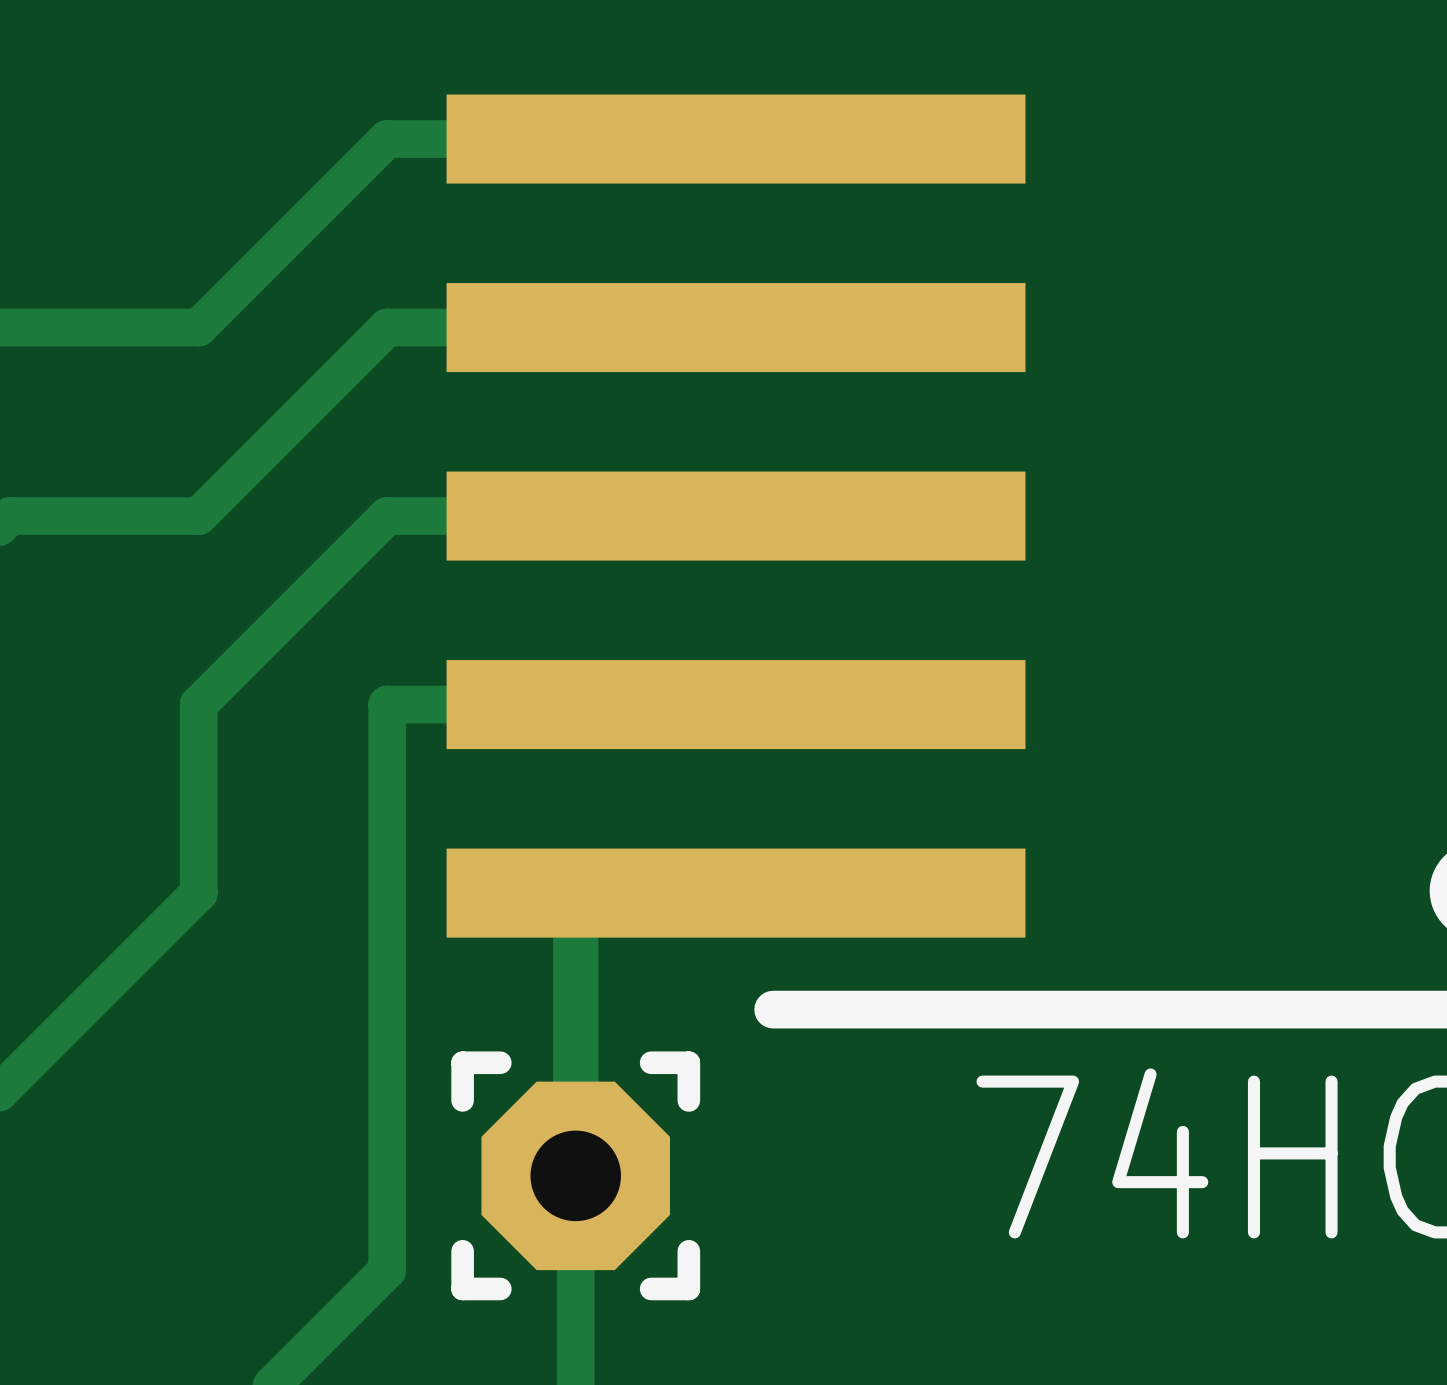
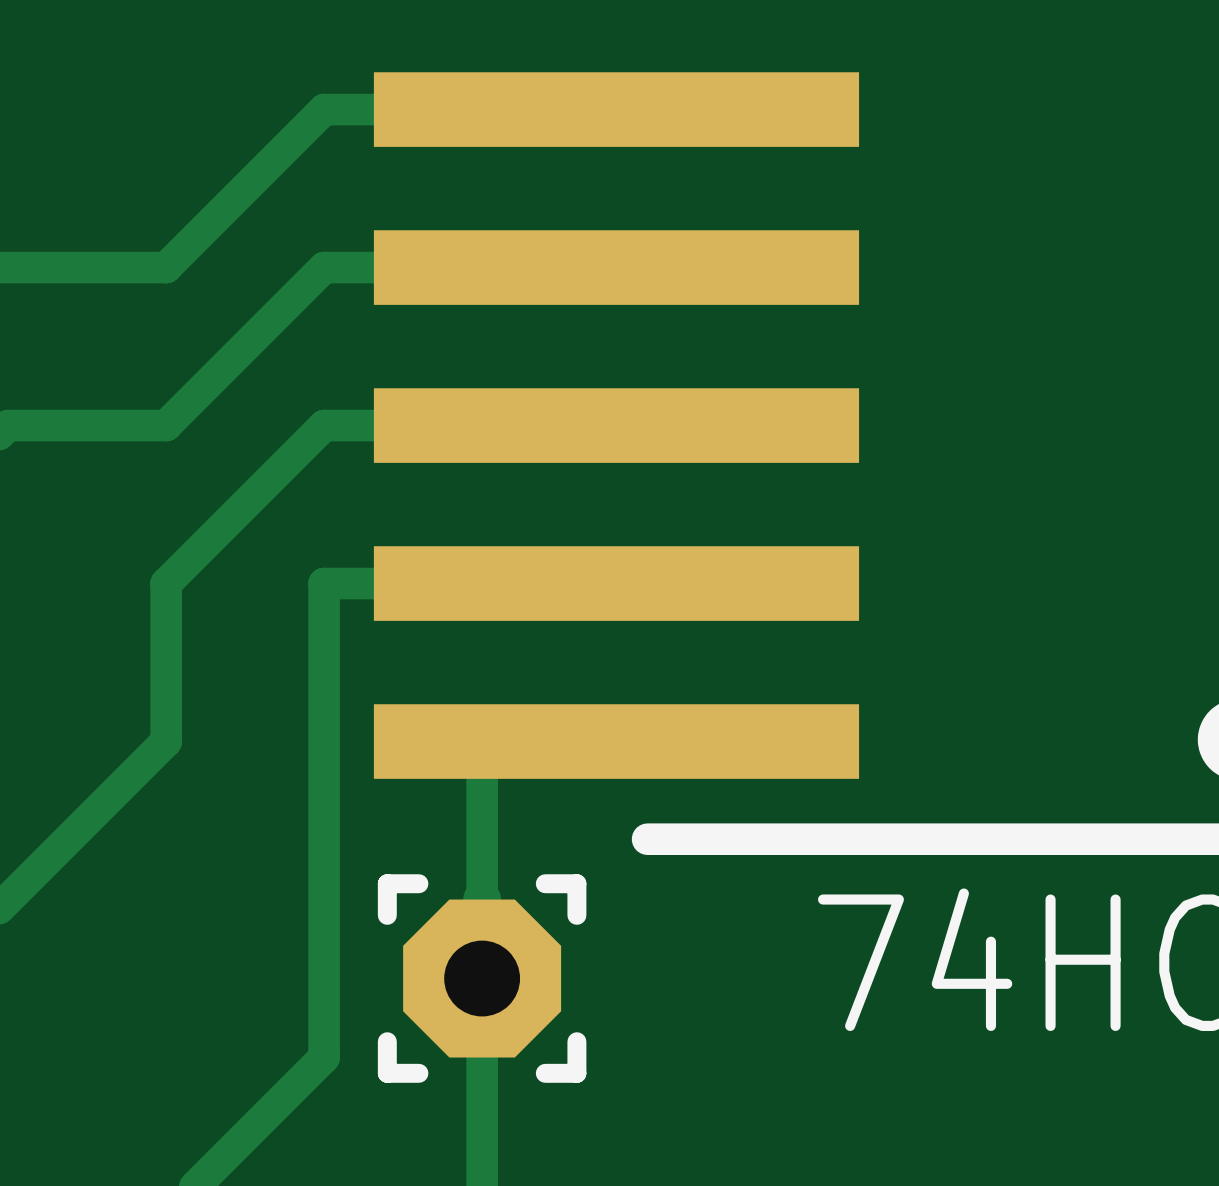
track width: thick (575, 893) (575, 1081) -> thin (482, 741) (482, 899)

